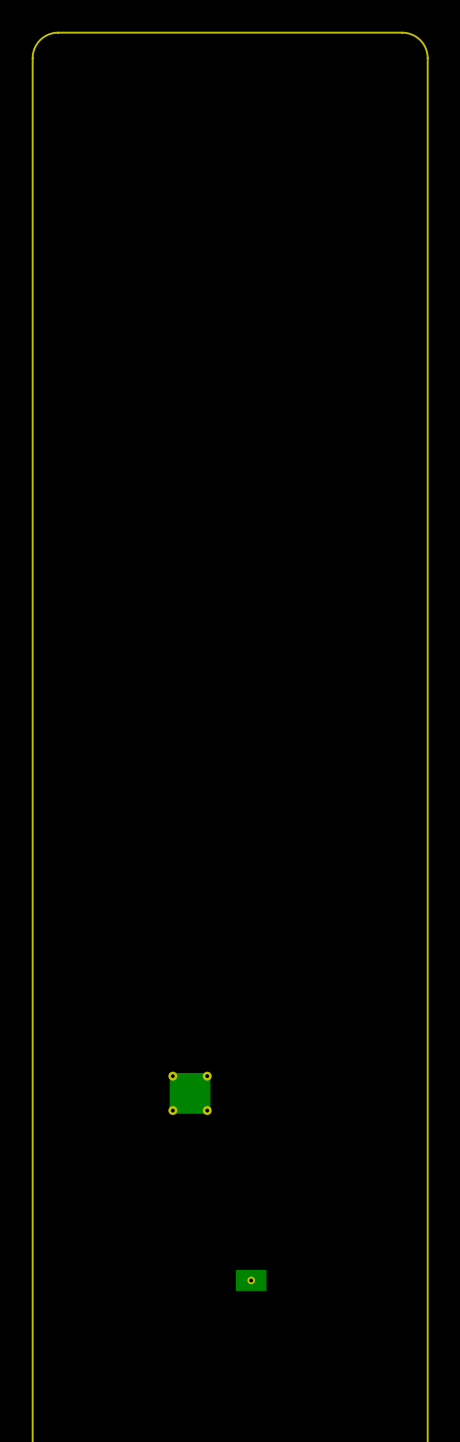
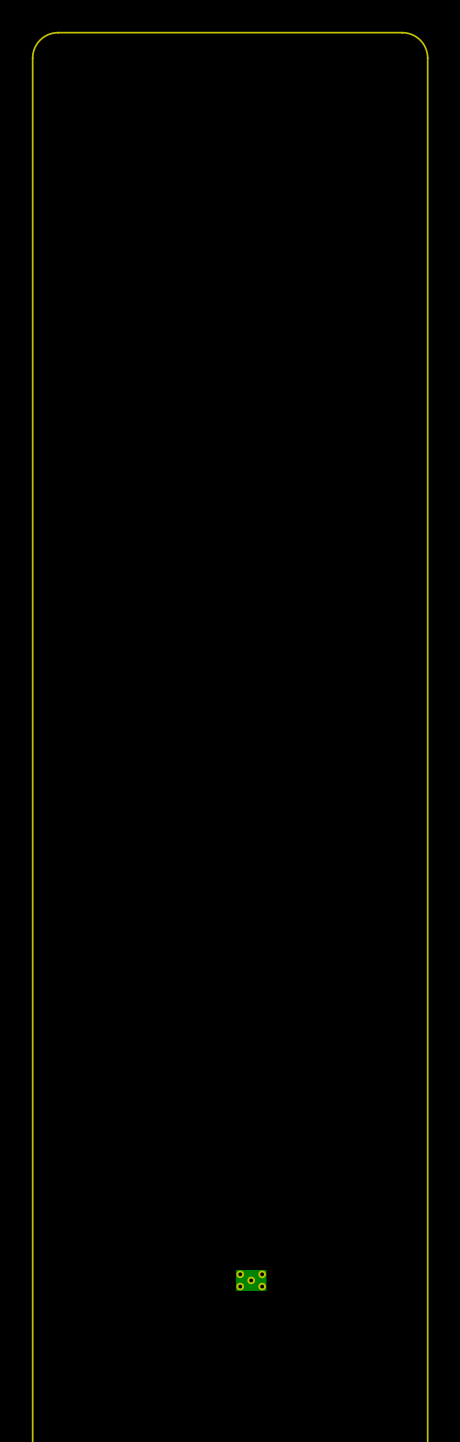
part: (190, 1093) -> none
part footprint: [235, 1269, 267, 1291] -> [235, 1269, 267, 1291]

